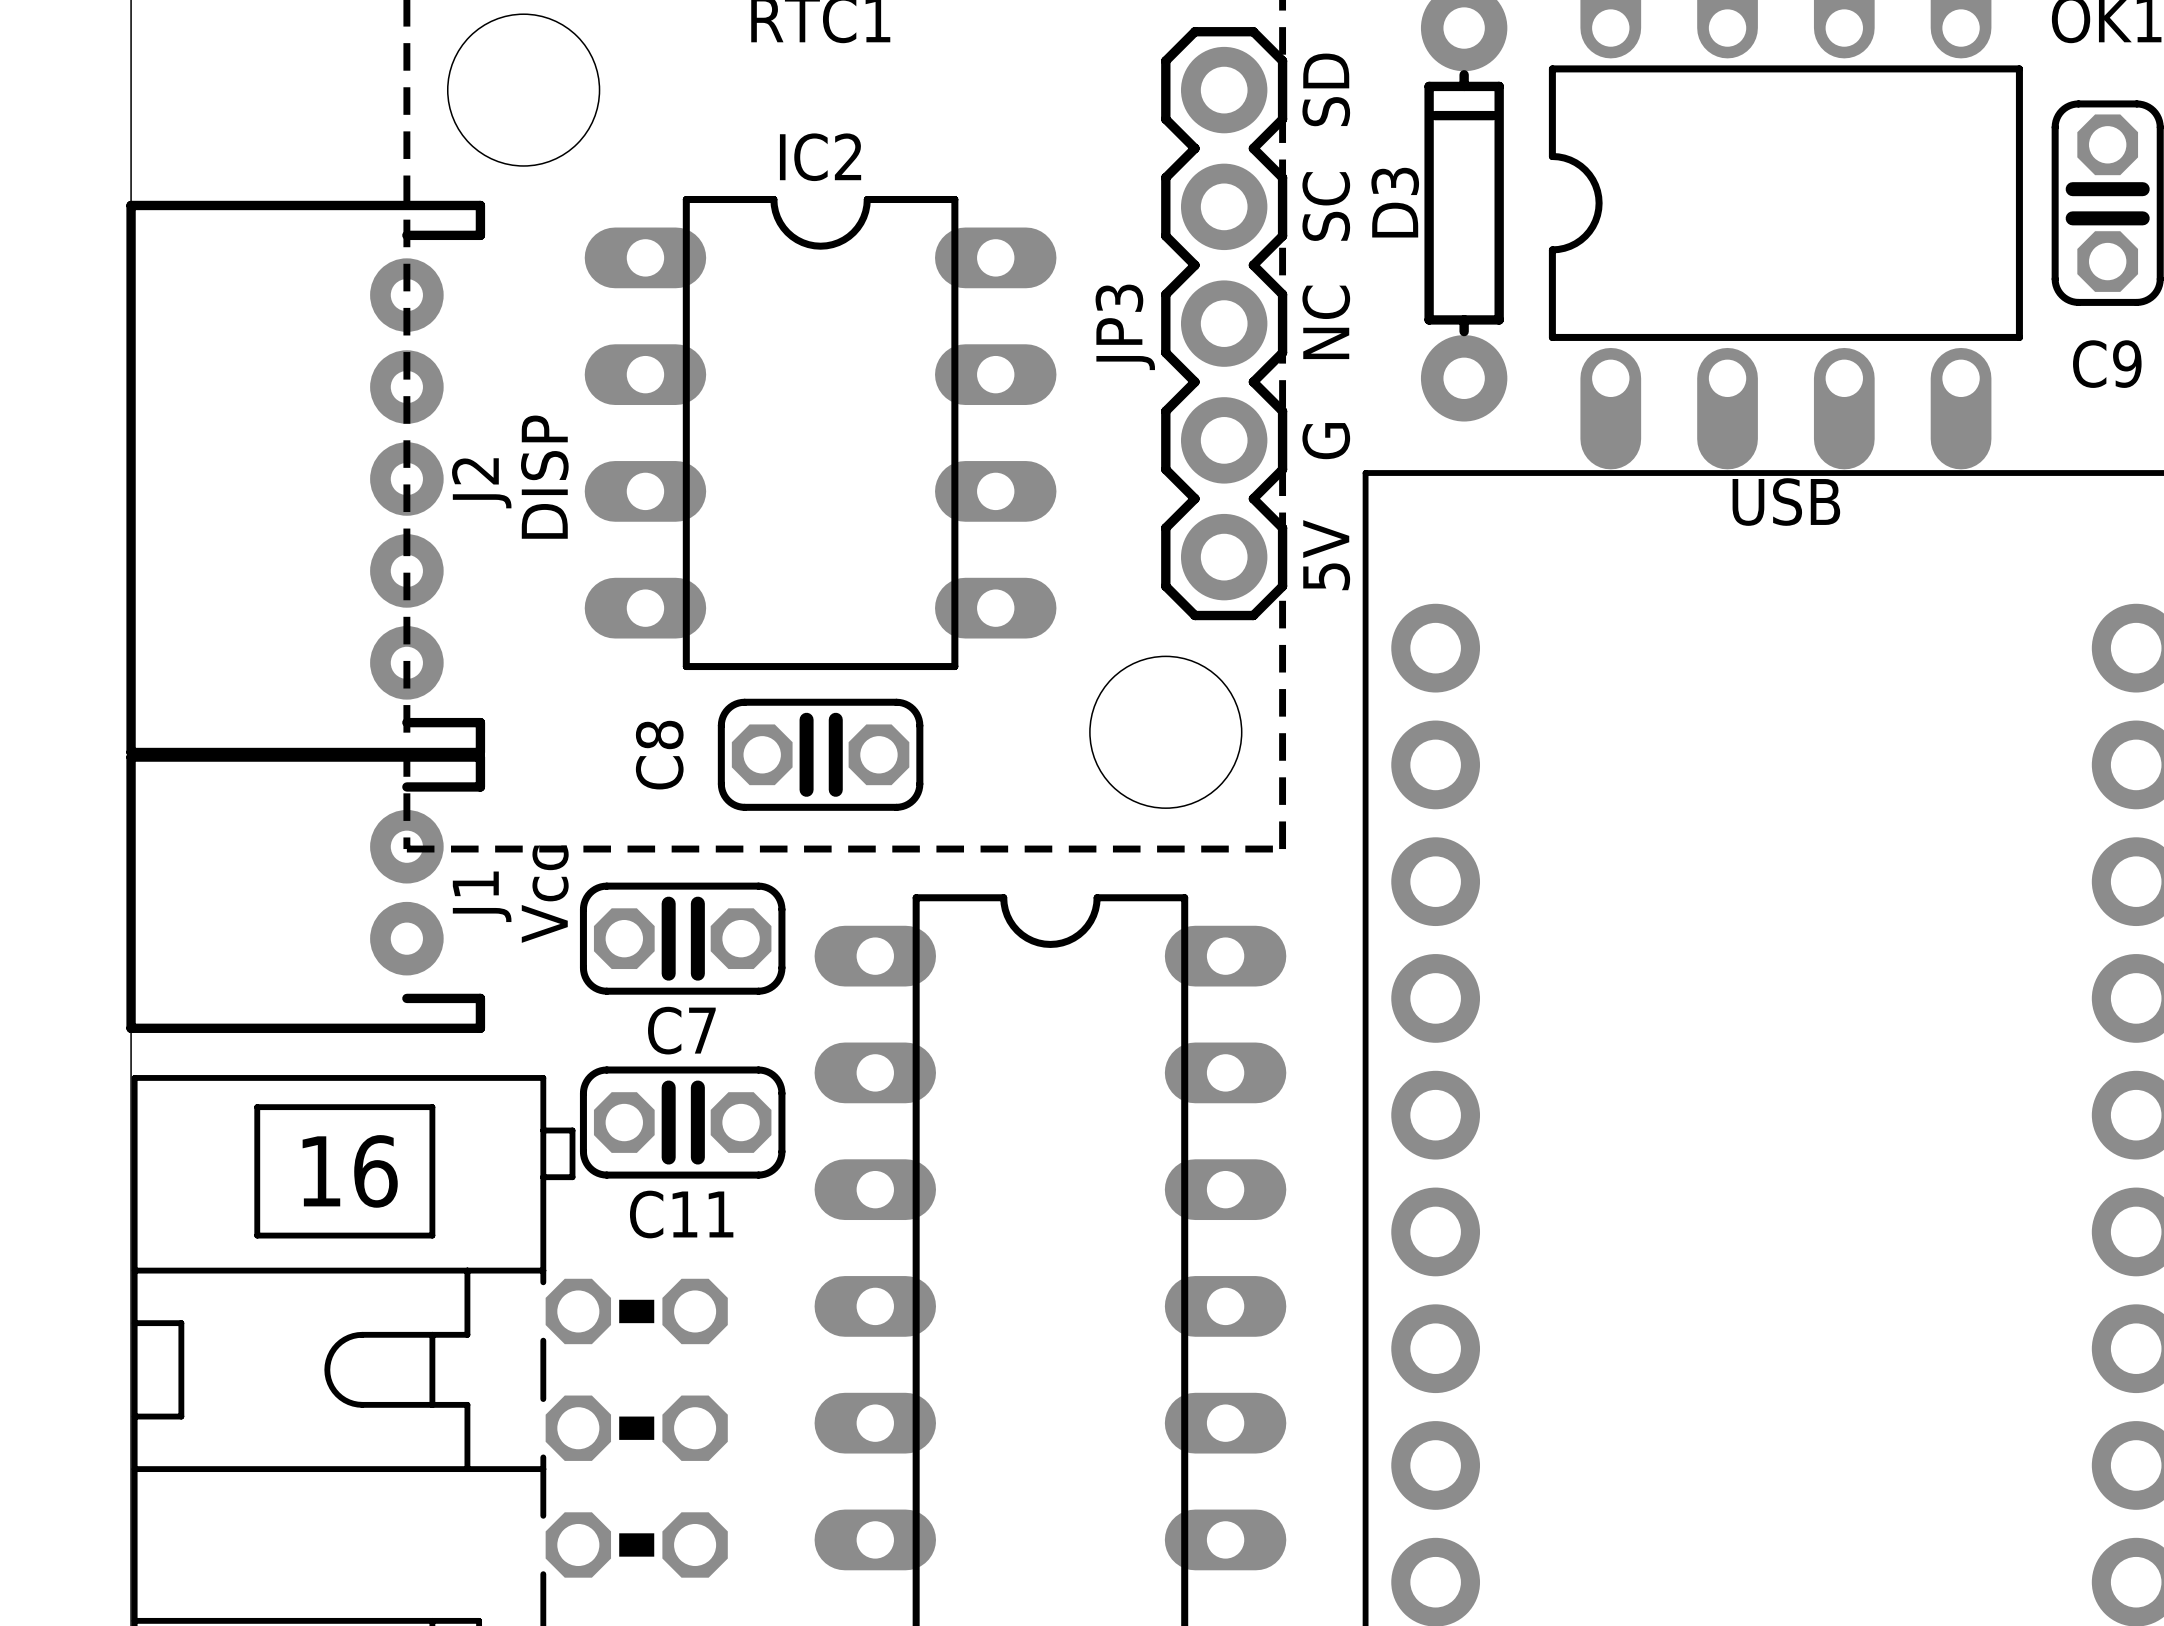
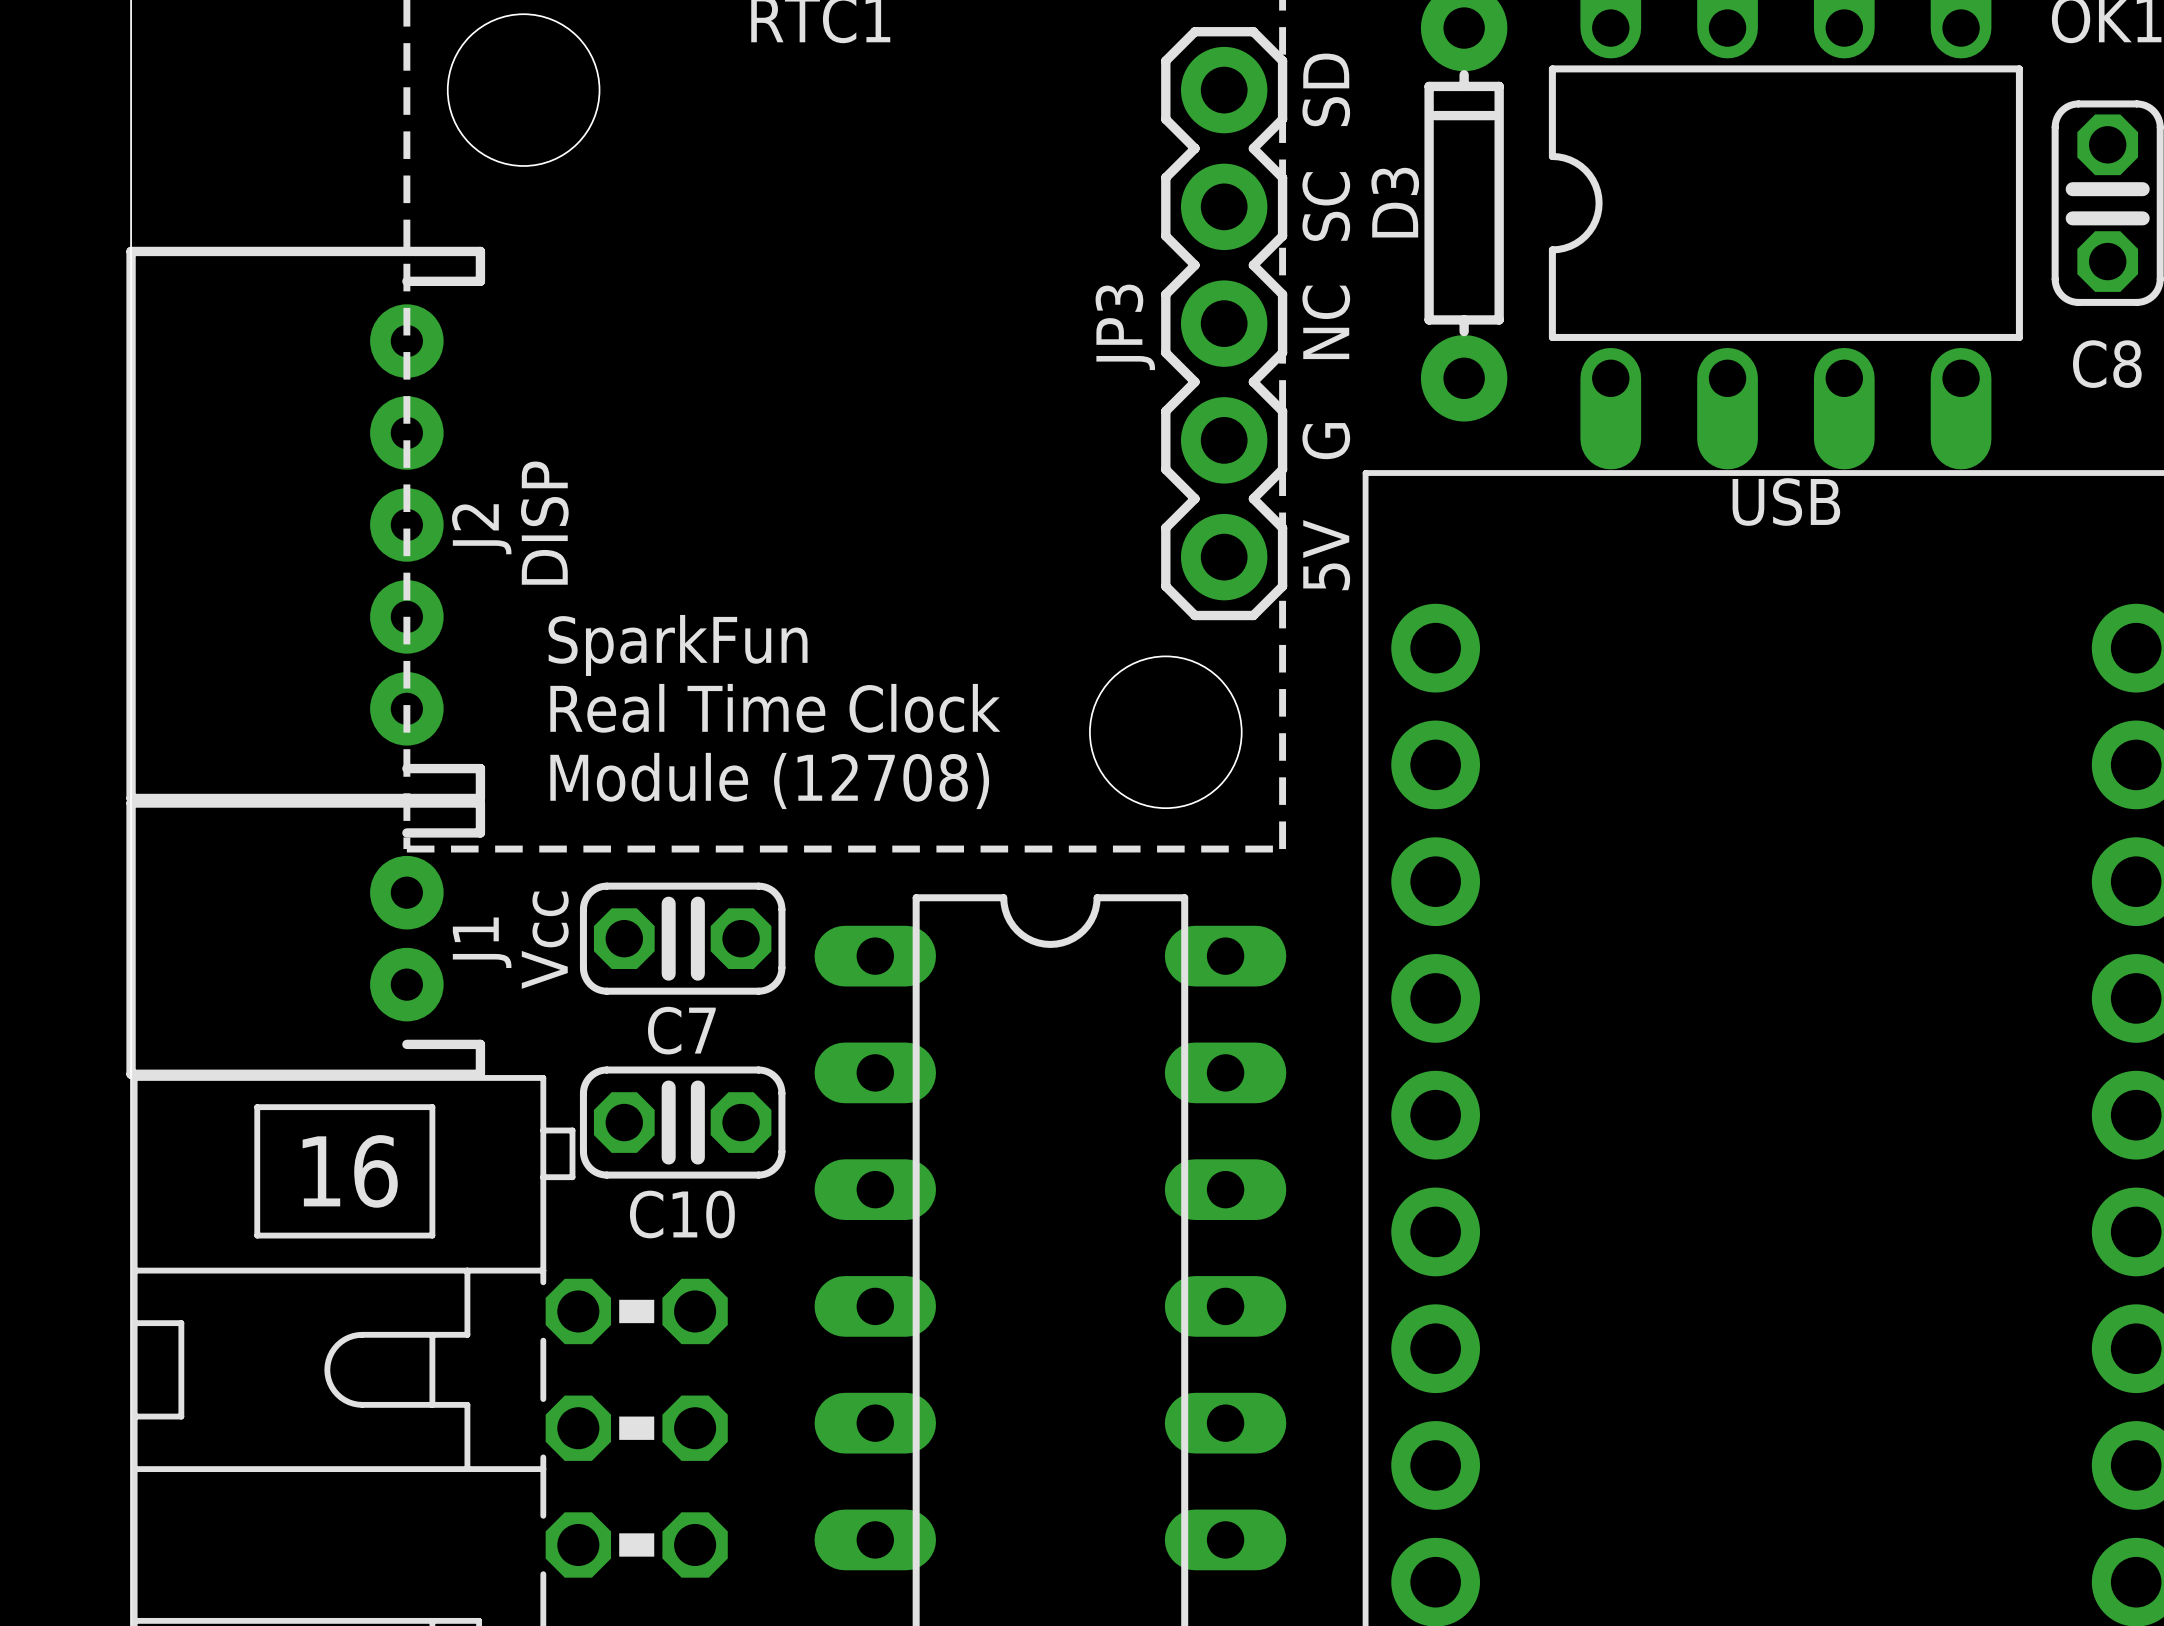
C9 name: C9 (2107, 364) -> C8 (2107, 364)
IC2: (820, 433) -> none
text position: DISP (544, 477) -> DISP (544, 523)
J2 position: (305, 478) -> (305, 524)
text: none -> SparkFun (678, 645)
text: none -> Real Time Clock (775, 708)
C8: (820, 754) -> none
text: none -> Module (12708) (769, 780)
J1 position: (305, 892) -> (305, 938)
text position: Vcc (545, 894) -> Vcc (545, 940)
C11 name: C11 (681, 1214) -> C10 (682, 1214)

